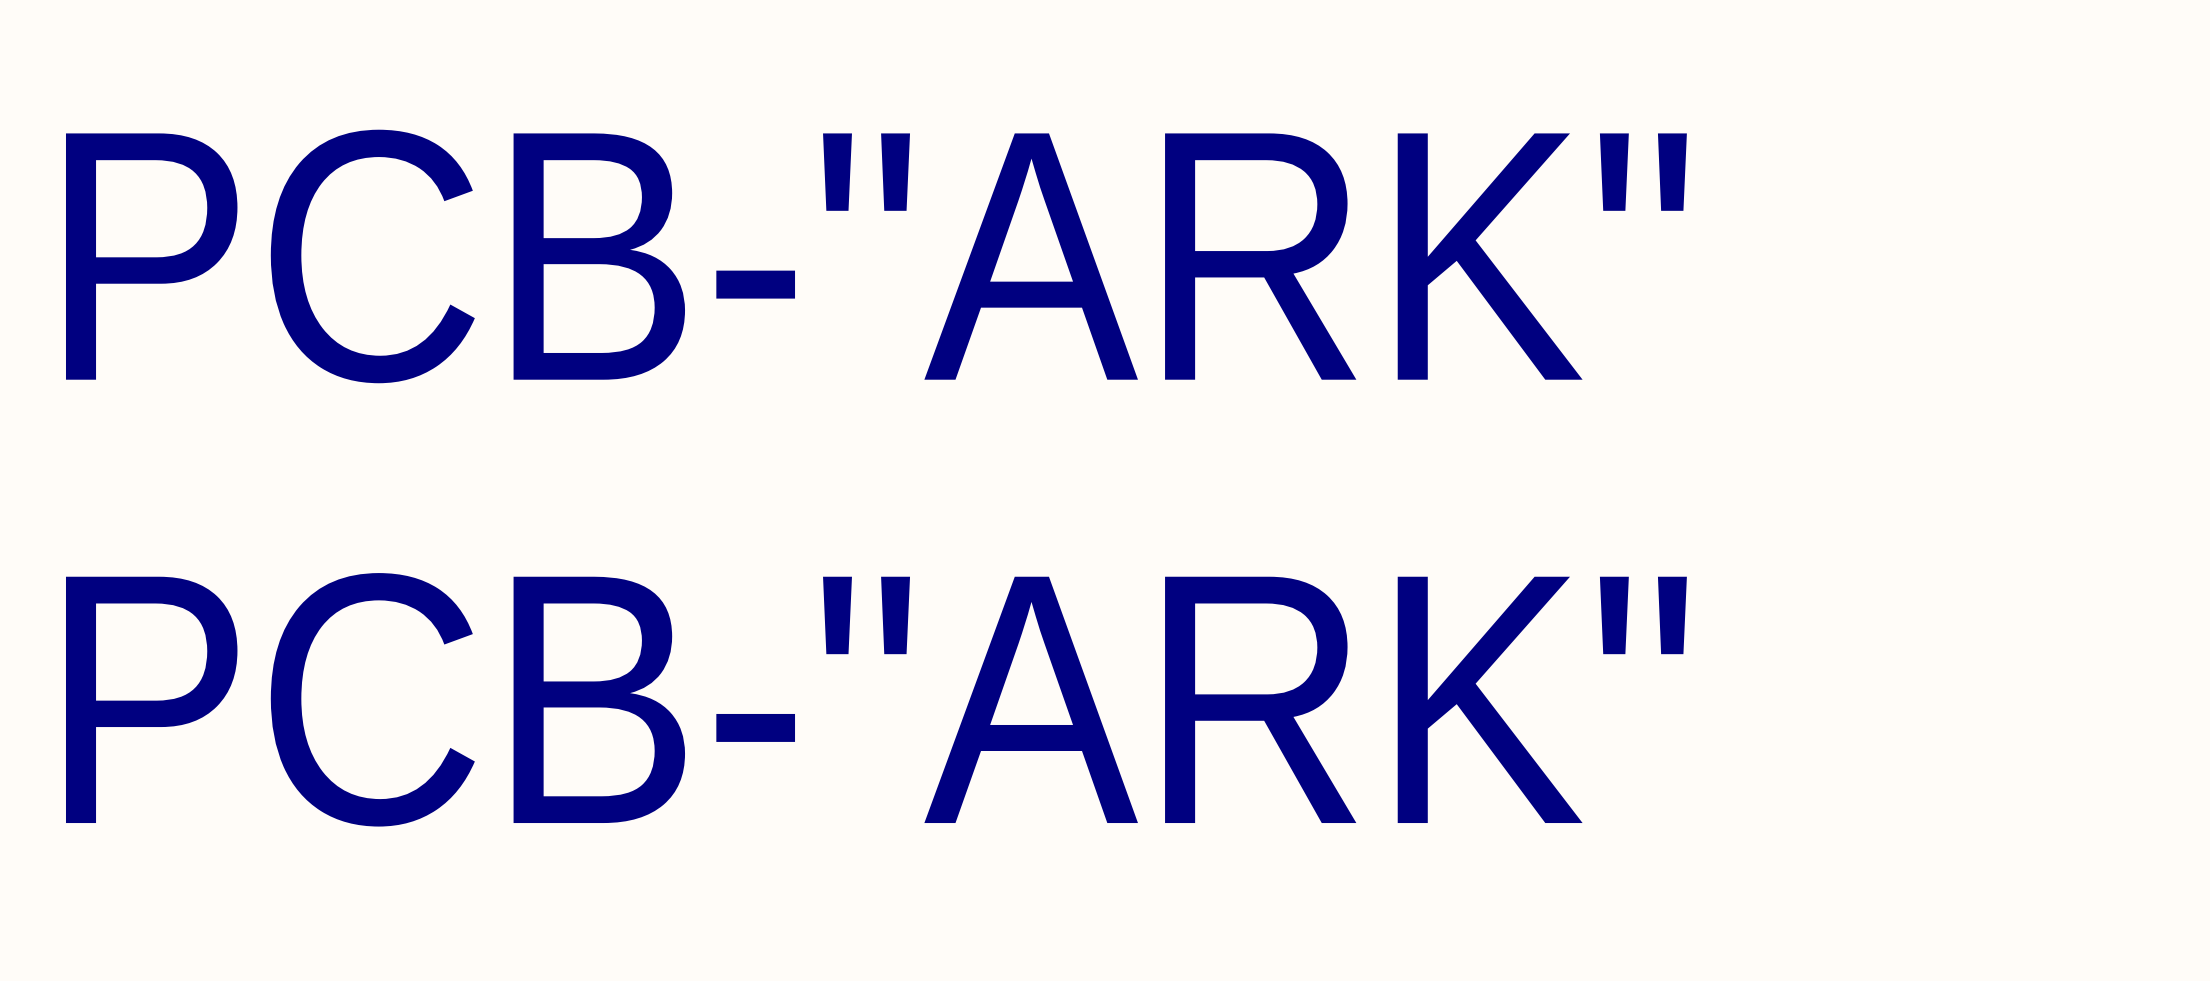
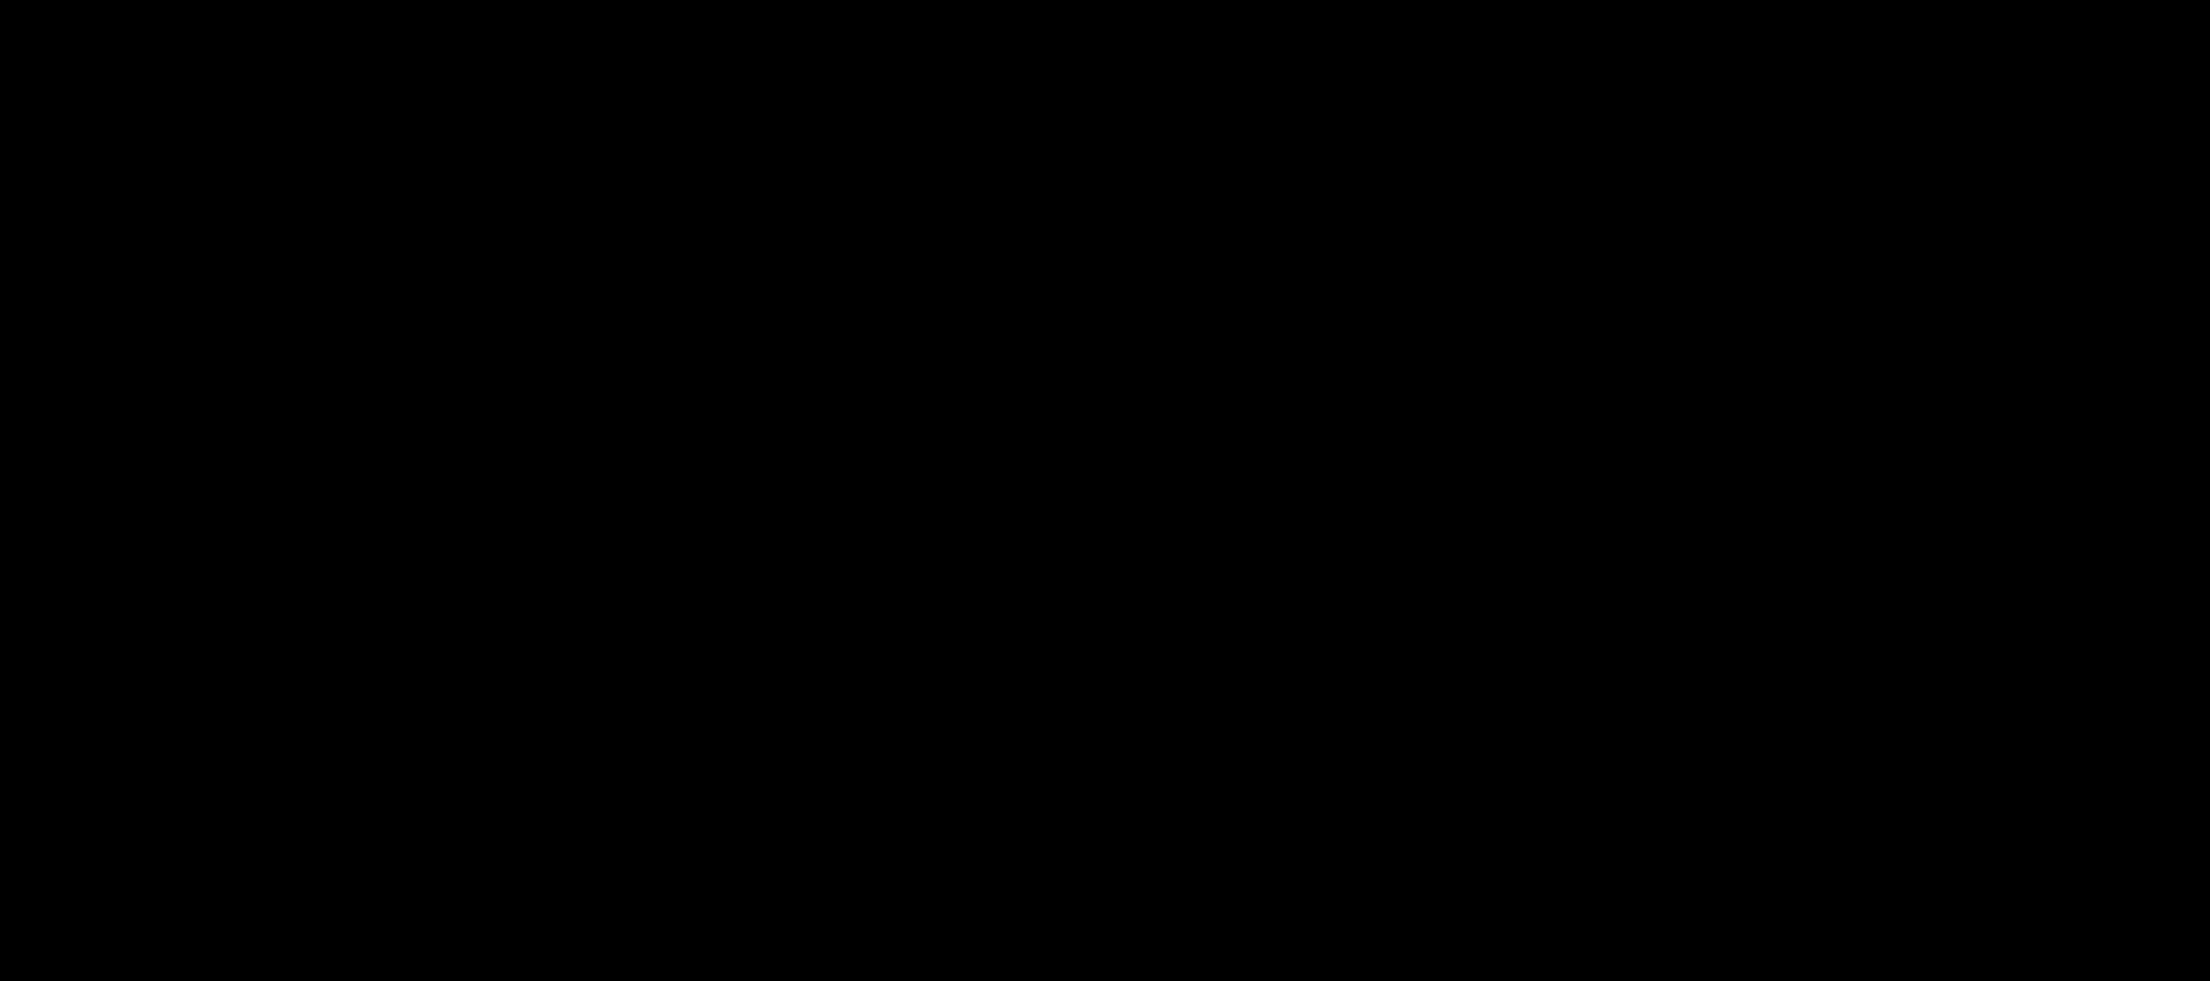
part: PCB-"ARK" (876, 256) -> none
part: PCB-"ARK" (876, 699) -> none

